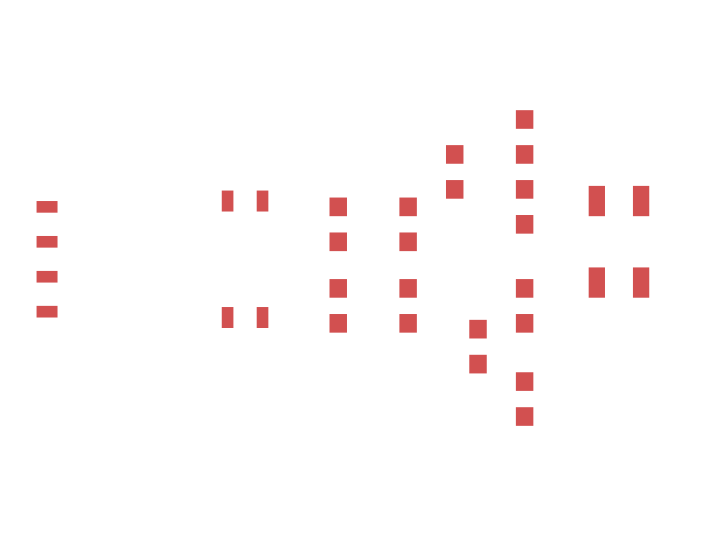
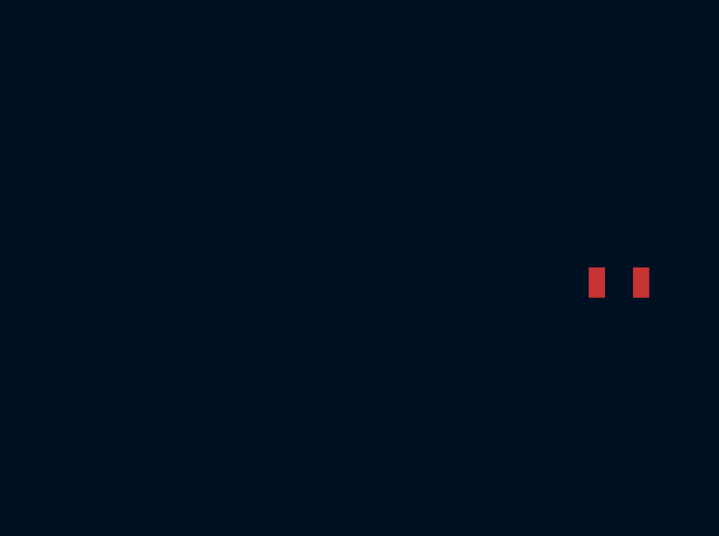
part: (524, 136) -> none
part: (454, 171) -> none
part: (245, 201) -> none
part: (618, 201) -> none
part: (524, 206) -> none
part: (47, 224) -> none
part: (338, 224) -> none
part: (408, 224) -> none
part: (47, 294) -> none
part: (338, 305) -> none
part: (408, 305) -> none
part: (524, 305) -> none
part: (245, 317) -> none
part: (478, 346) -> none
part: (524, 399) -> none

